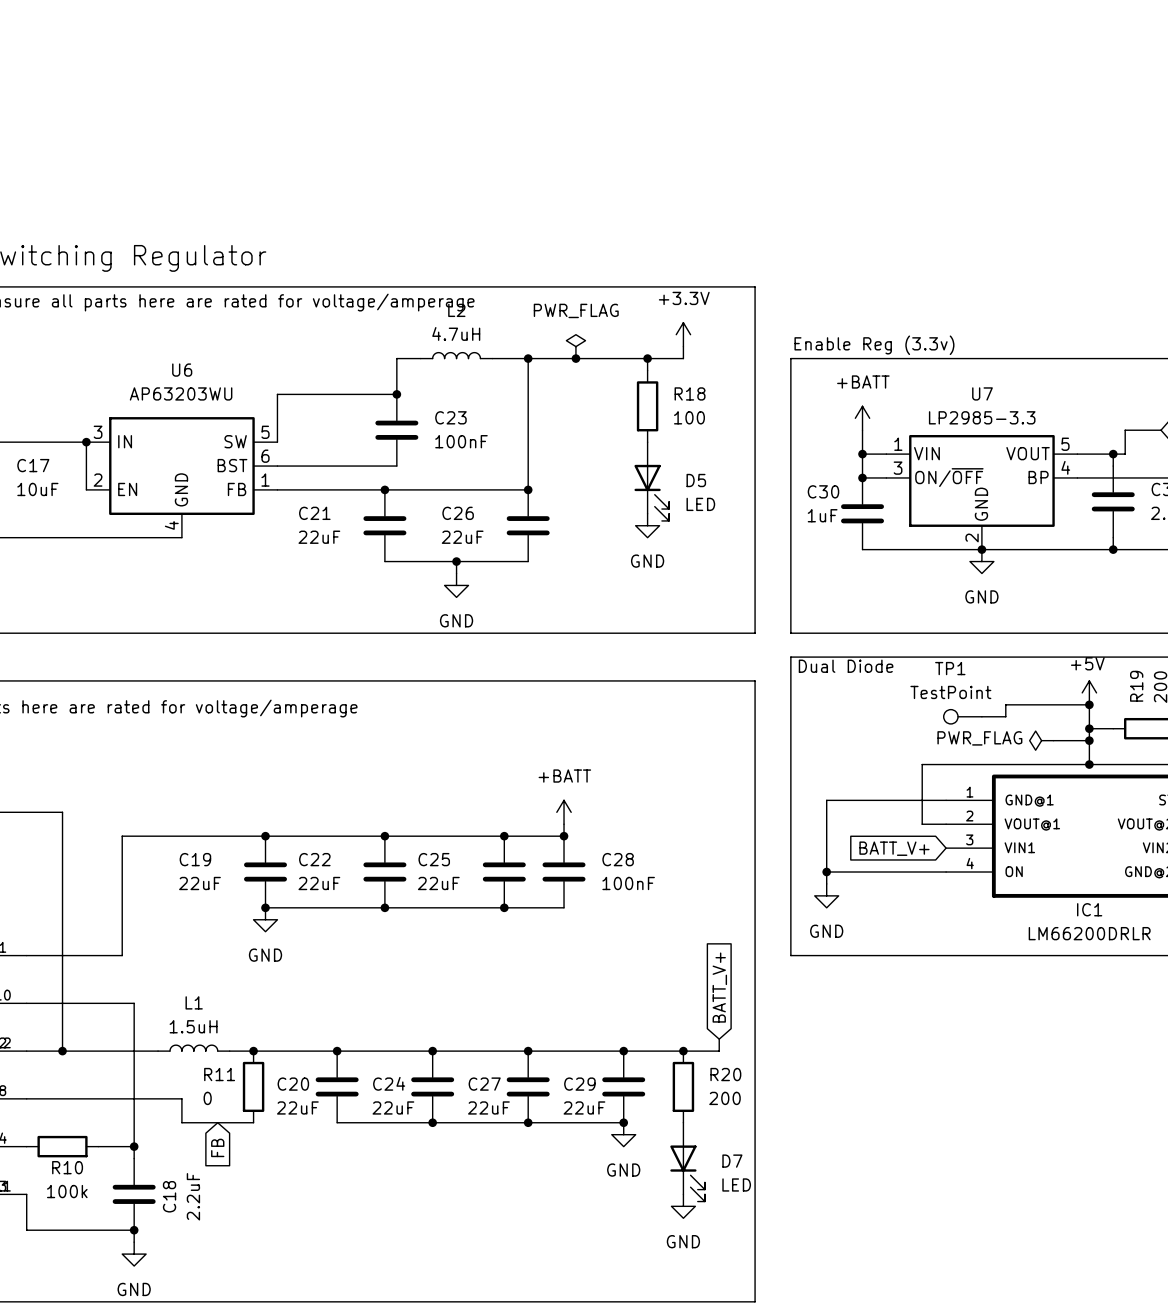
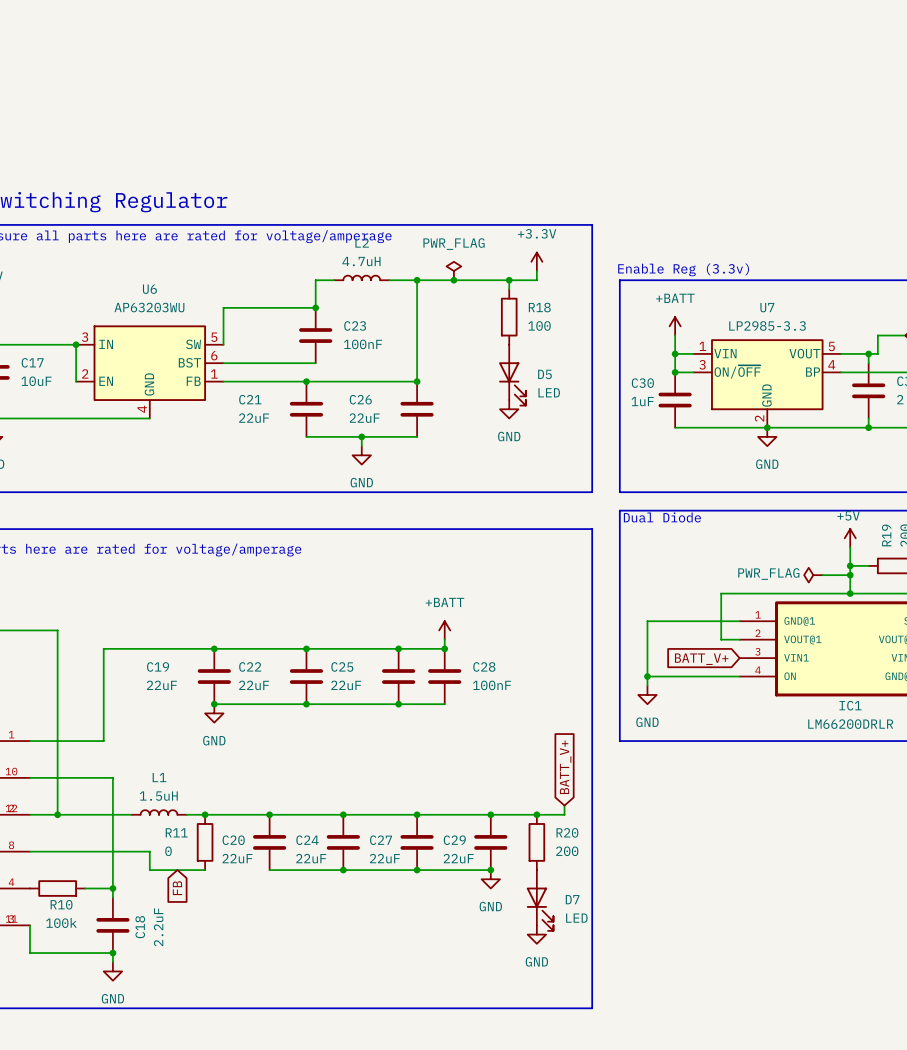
wire: (1089, 704) (1005, 704) (1005, 716) (981, 716) -> none
junction: (1089, 704) -> none
TP1: TestPoint (962, 716) -> none

